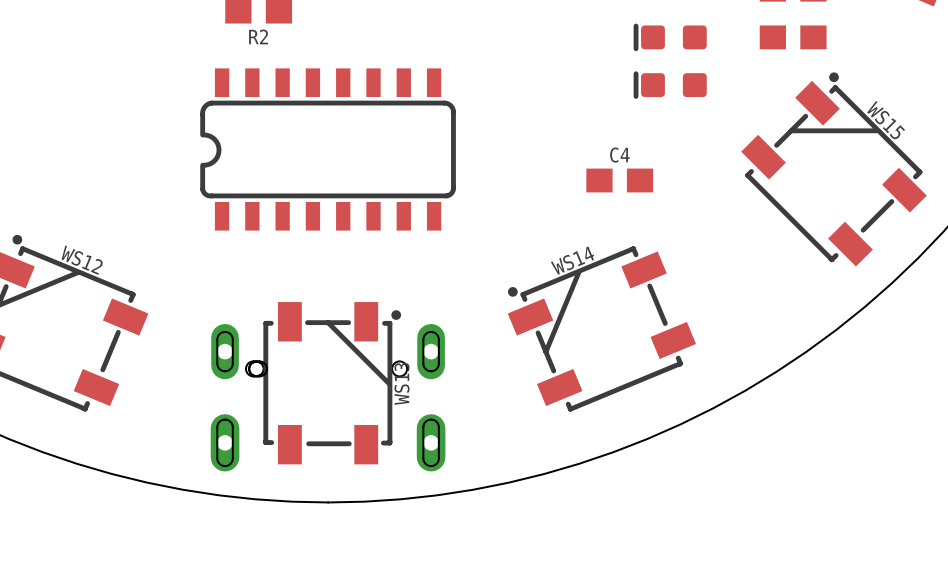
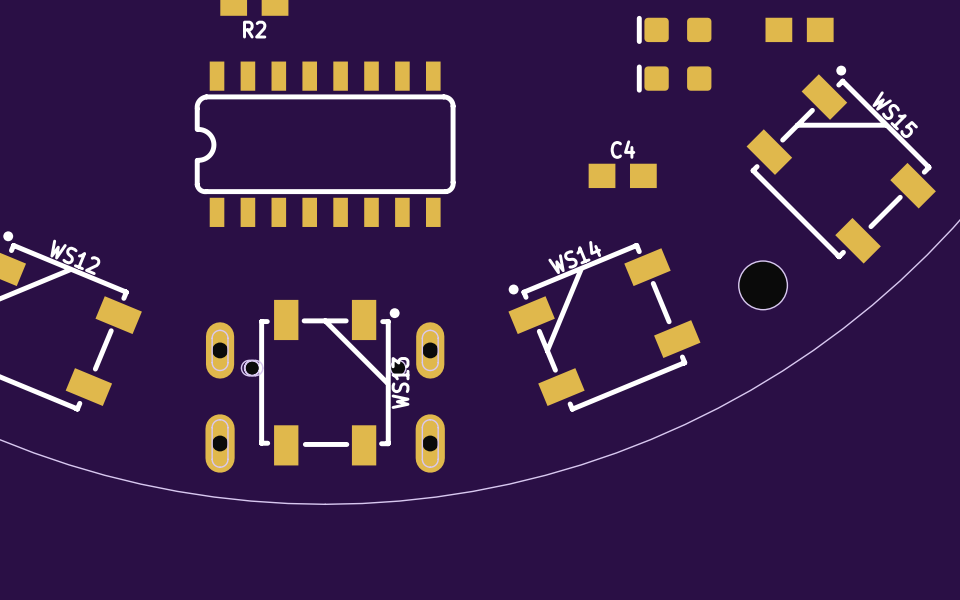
hole: none -> (763, 285)

